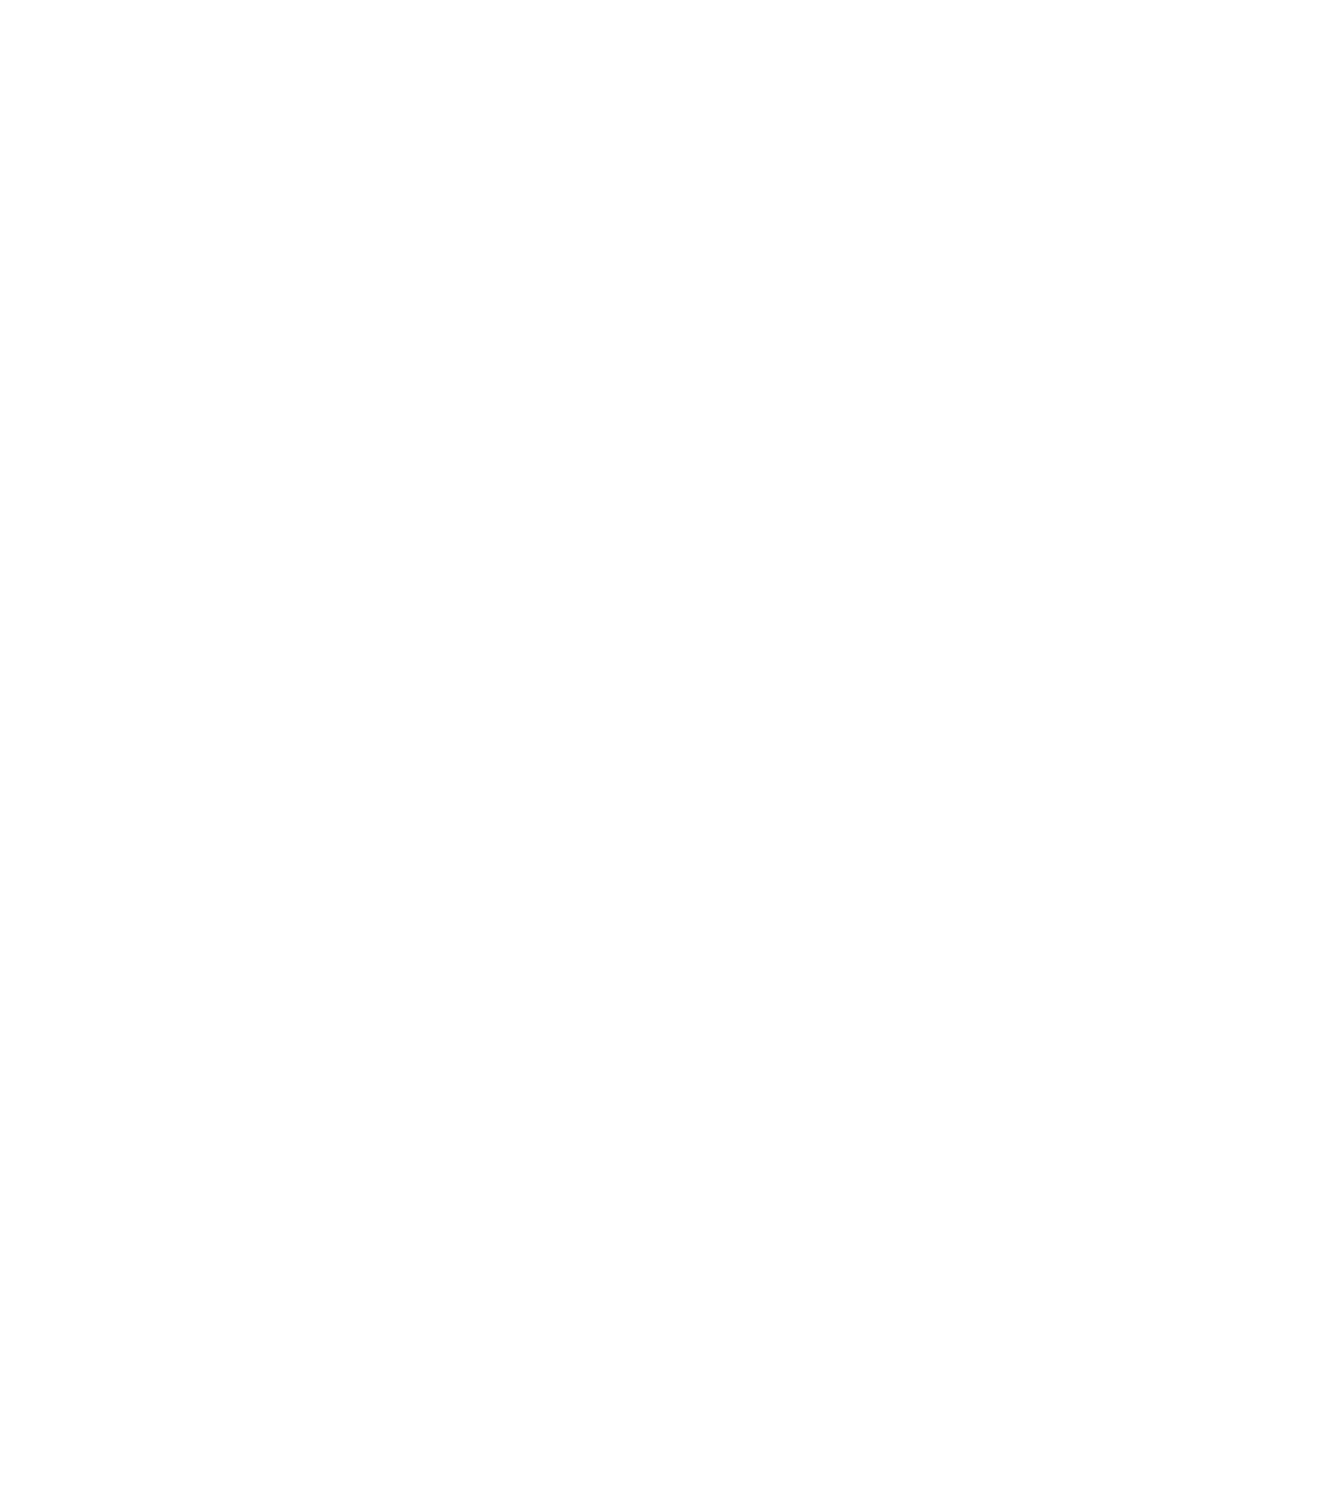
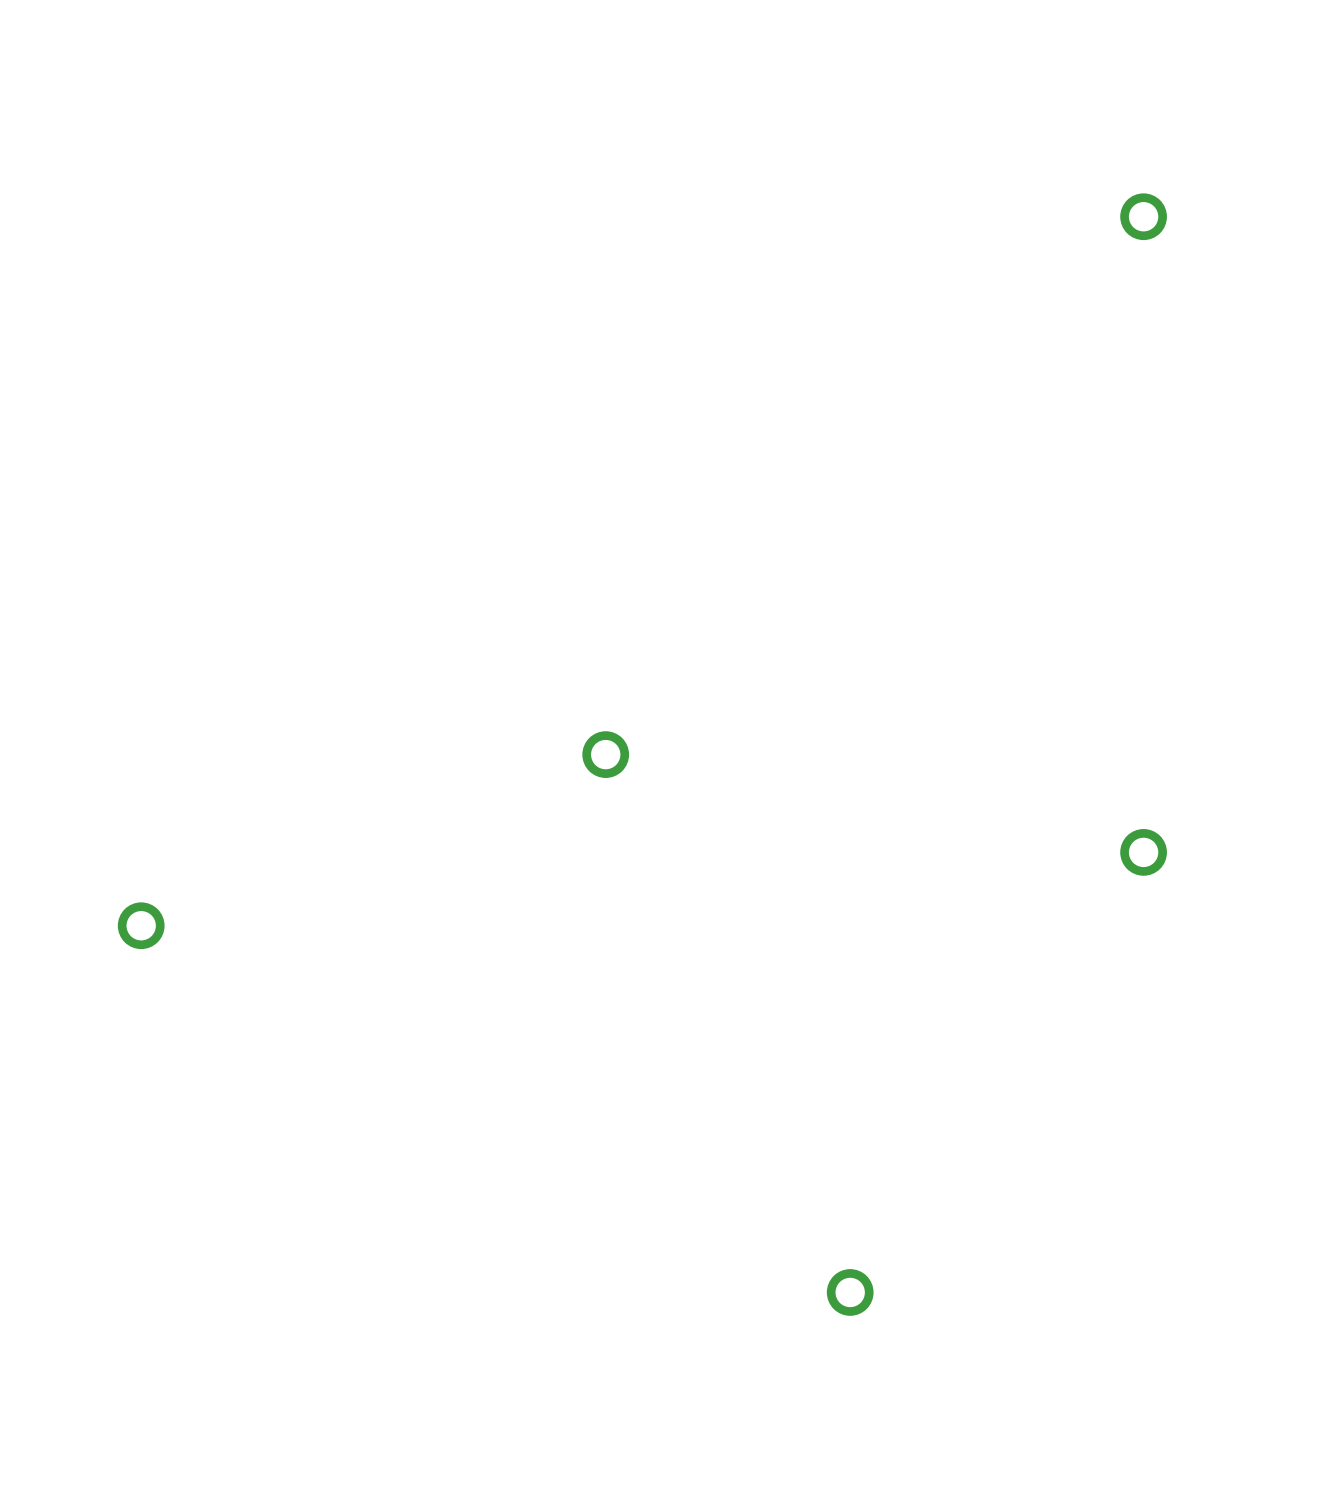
via: none -> (1143, 216)
via: none -> (605, 754)
via: none -> (1143, 852)
via: none -> (141, 925)
via: none -> (850, 1292)

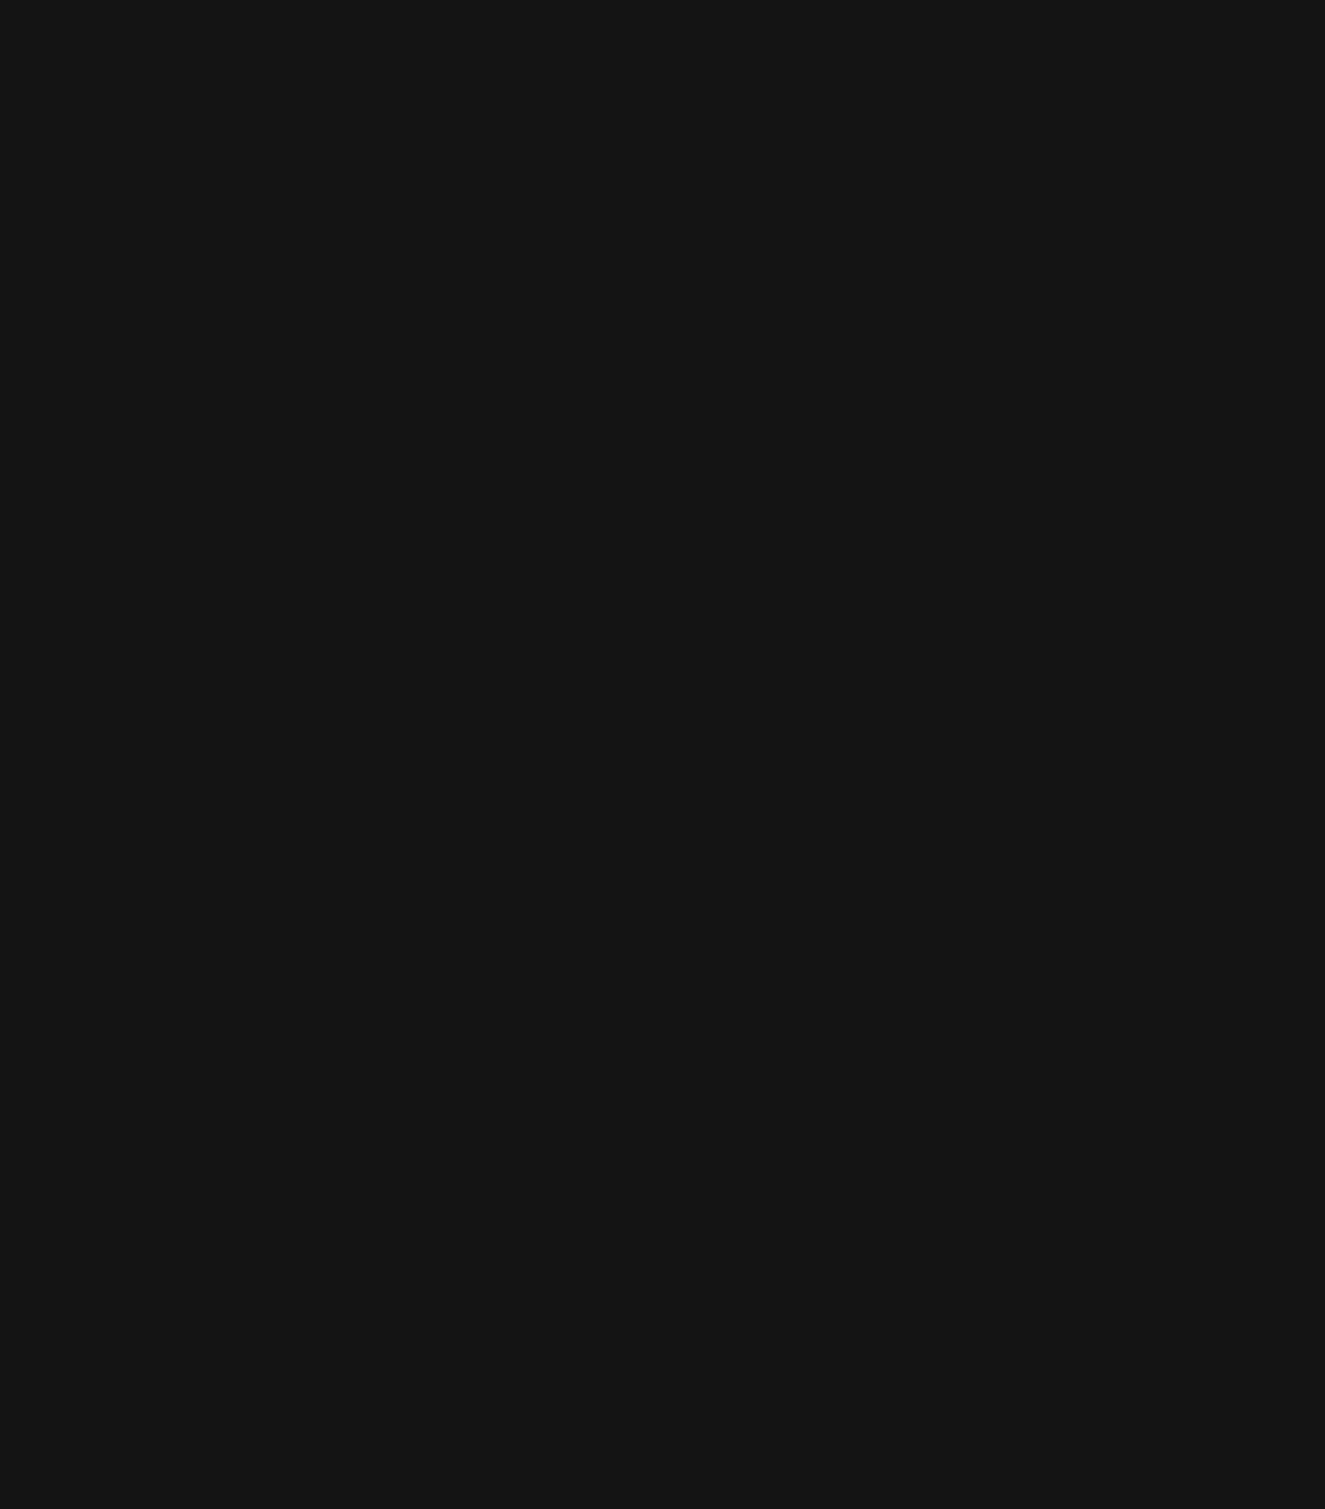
via: (1143, 216) -> none
via: (605, 754) -> none
via: (1143, 852) -> none
via: (141, 925) -> none
via: (850, 1292) -> none

